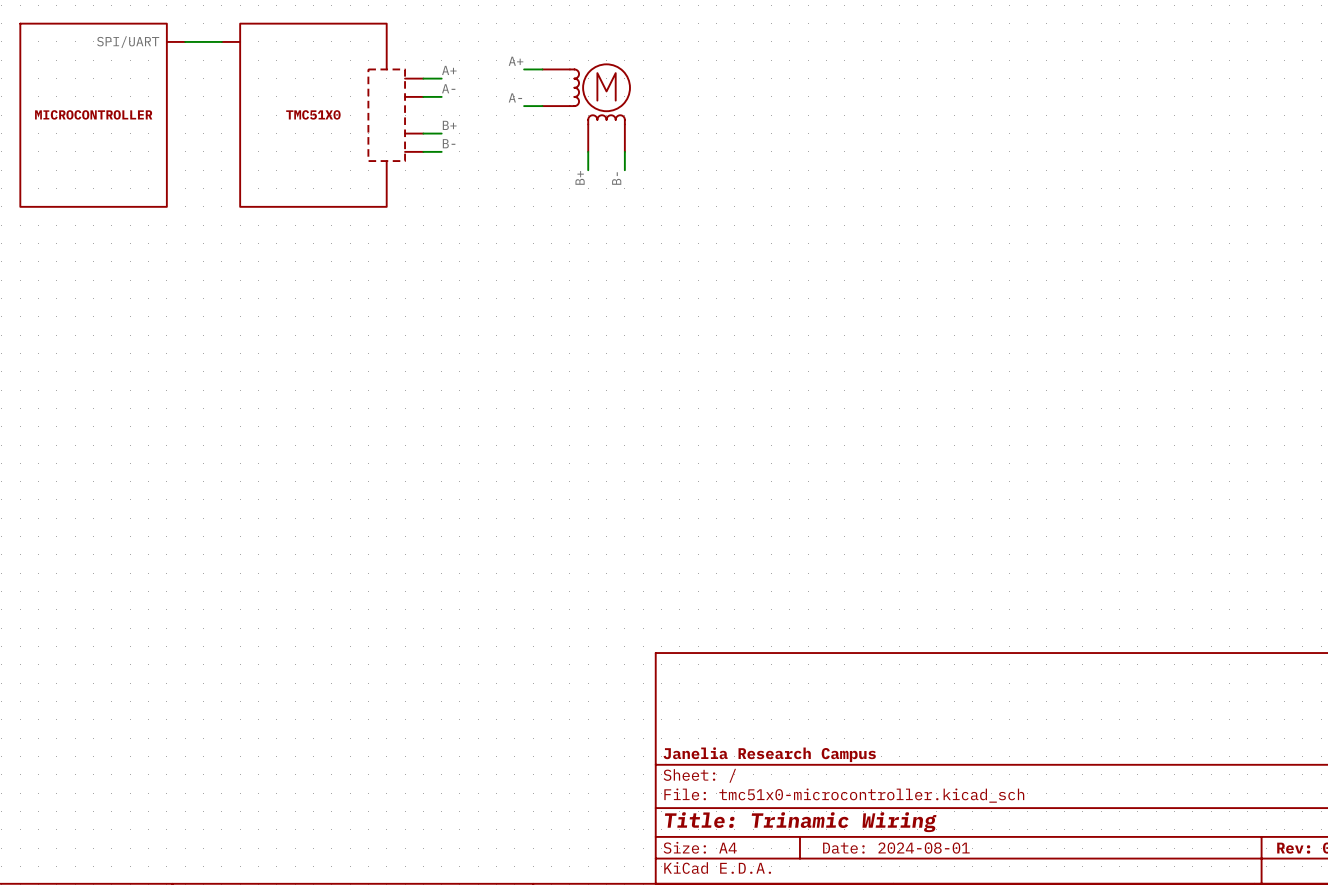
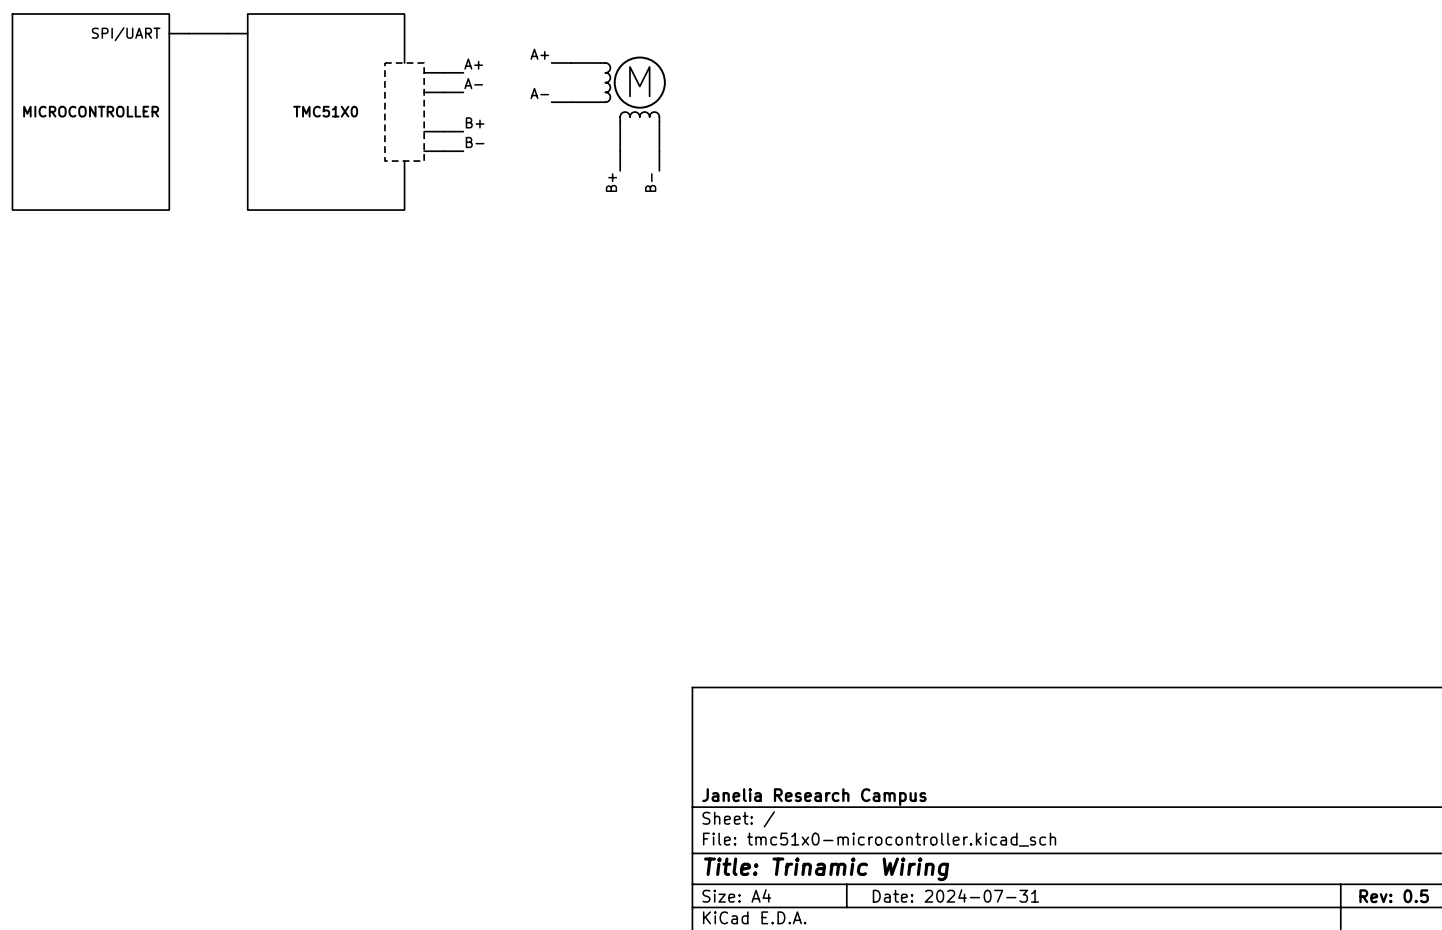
title block: Date: 2024-08-01 (896, 848) -> Date: 2024-07-31 (955, 895)

